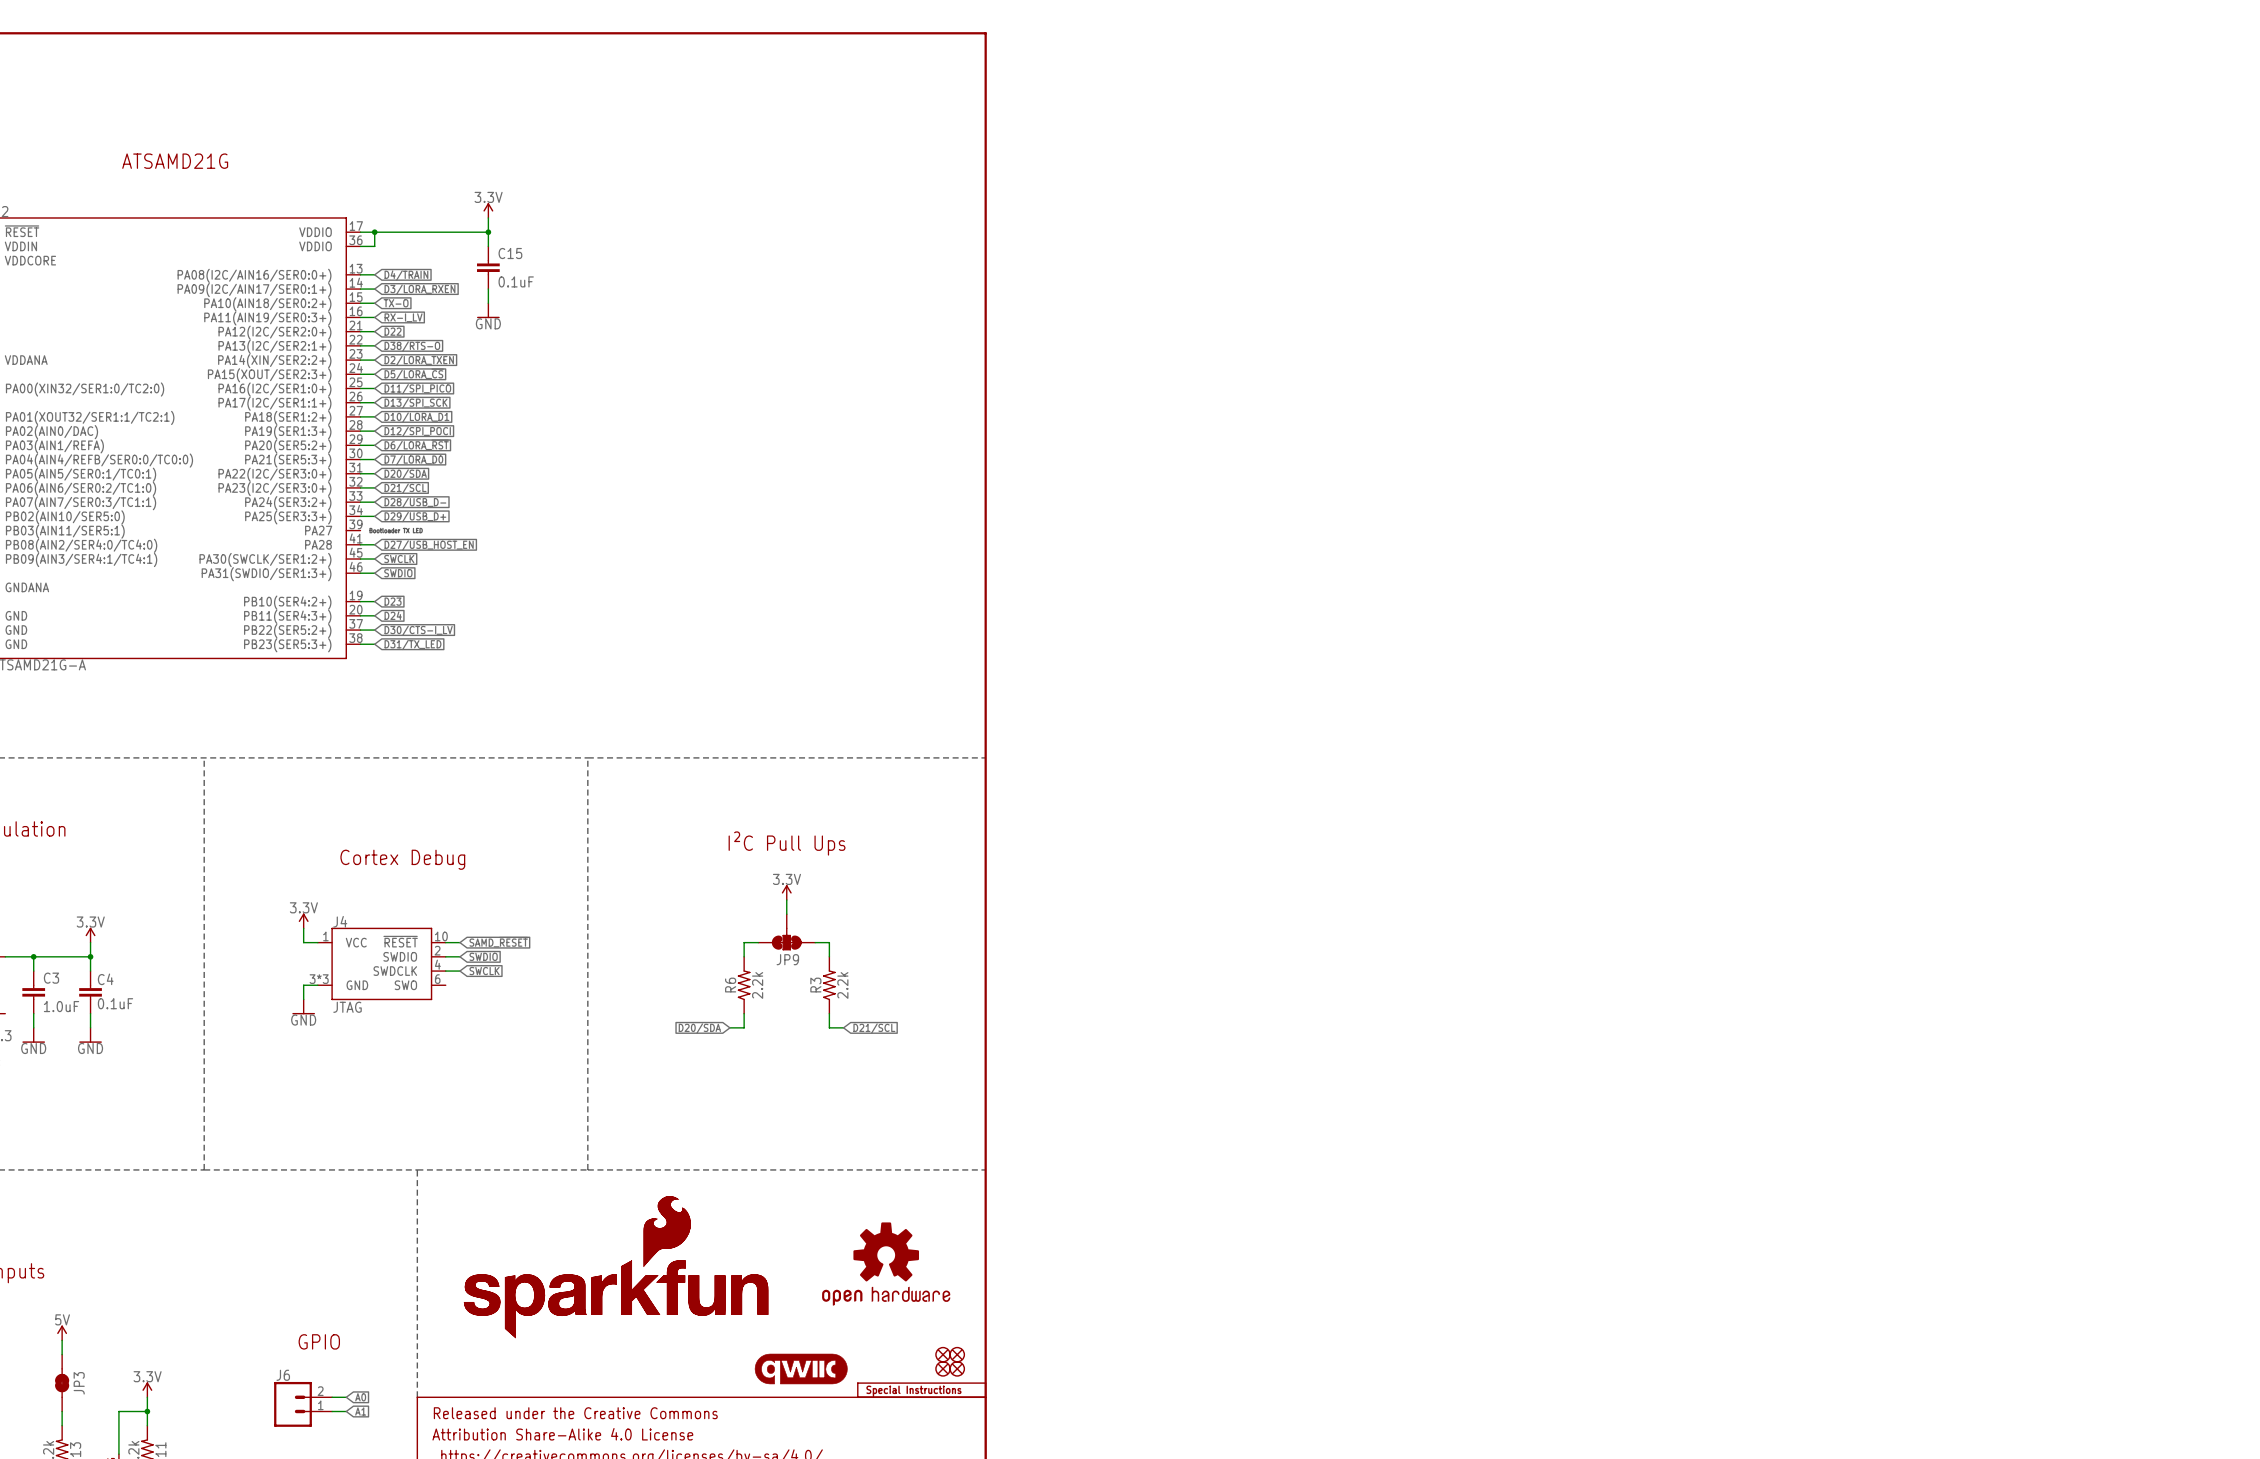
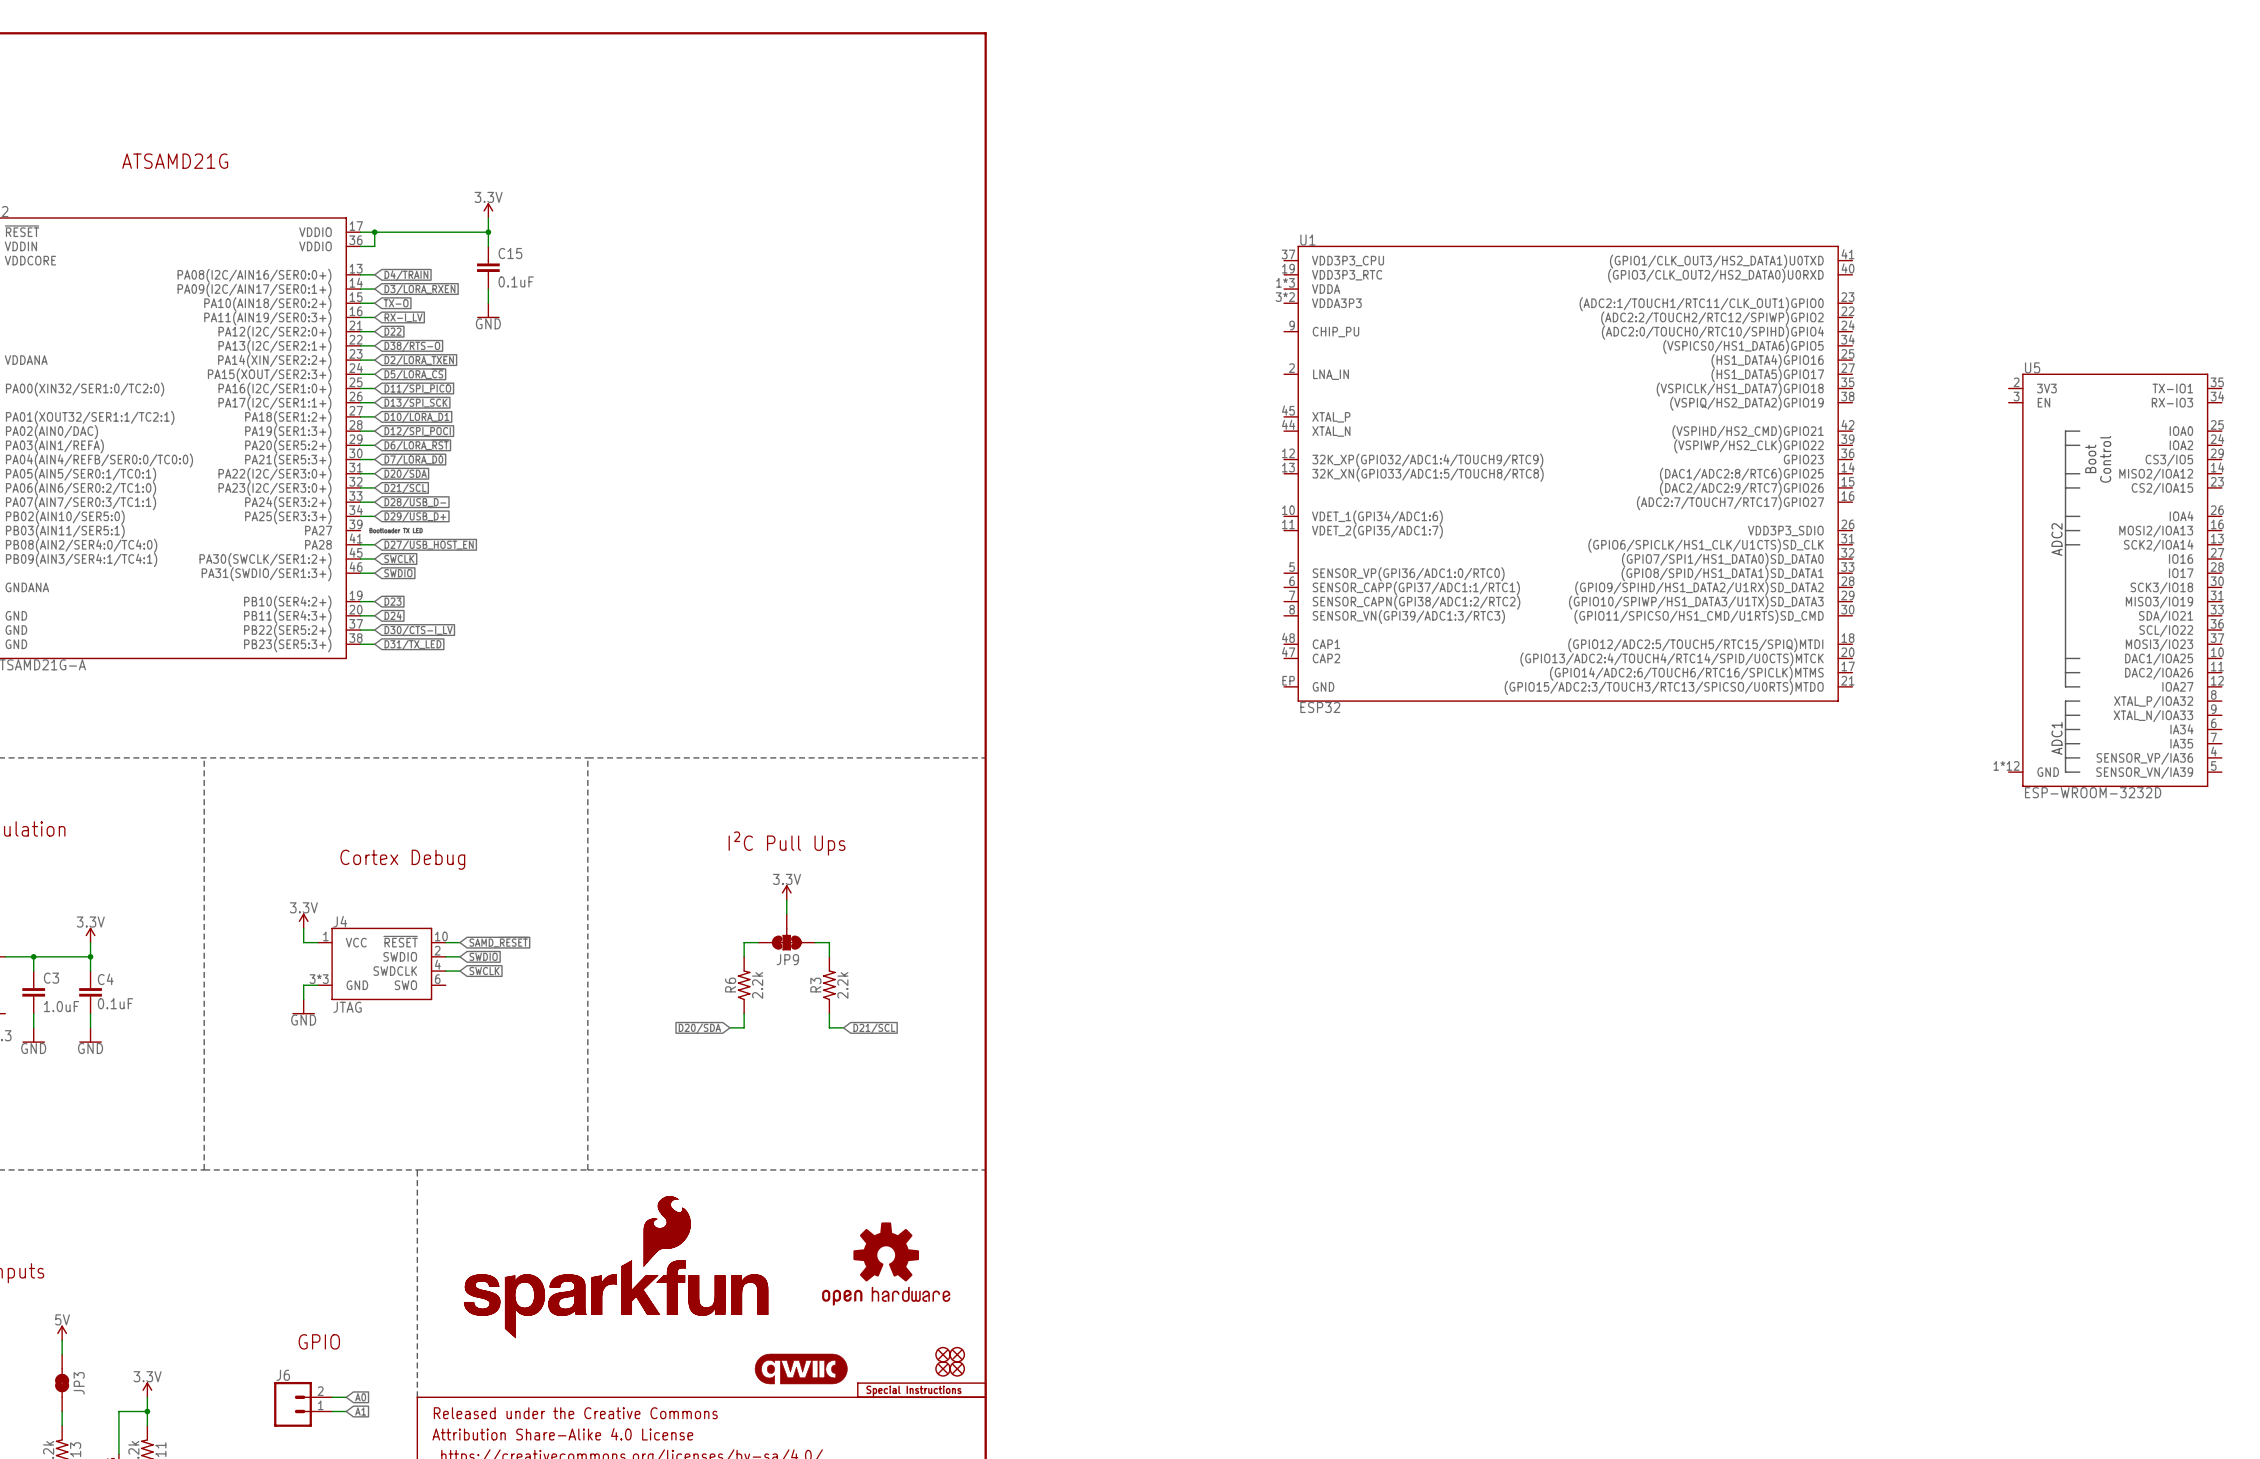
U1: none -> ESP32 (1568, 473)
U5: none -> ESP-WROOM-3232D (2115, 580)

